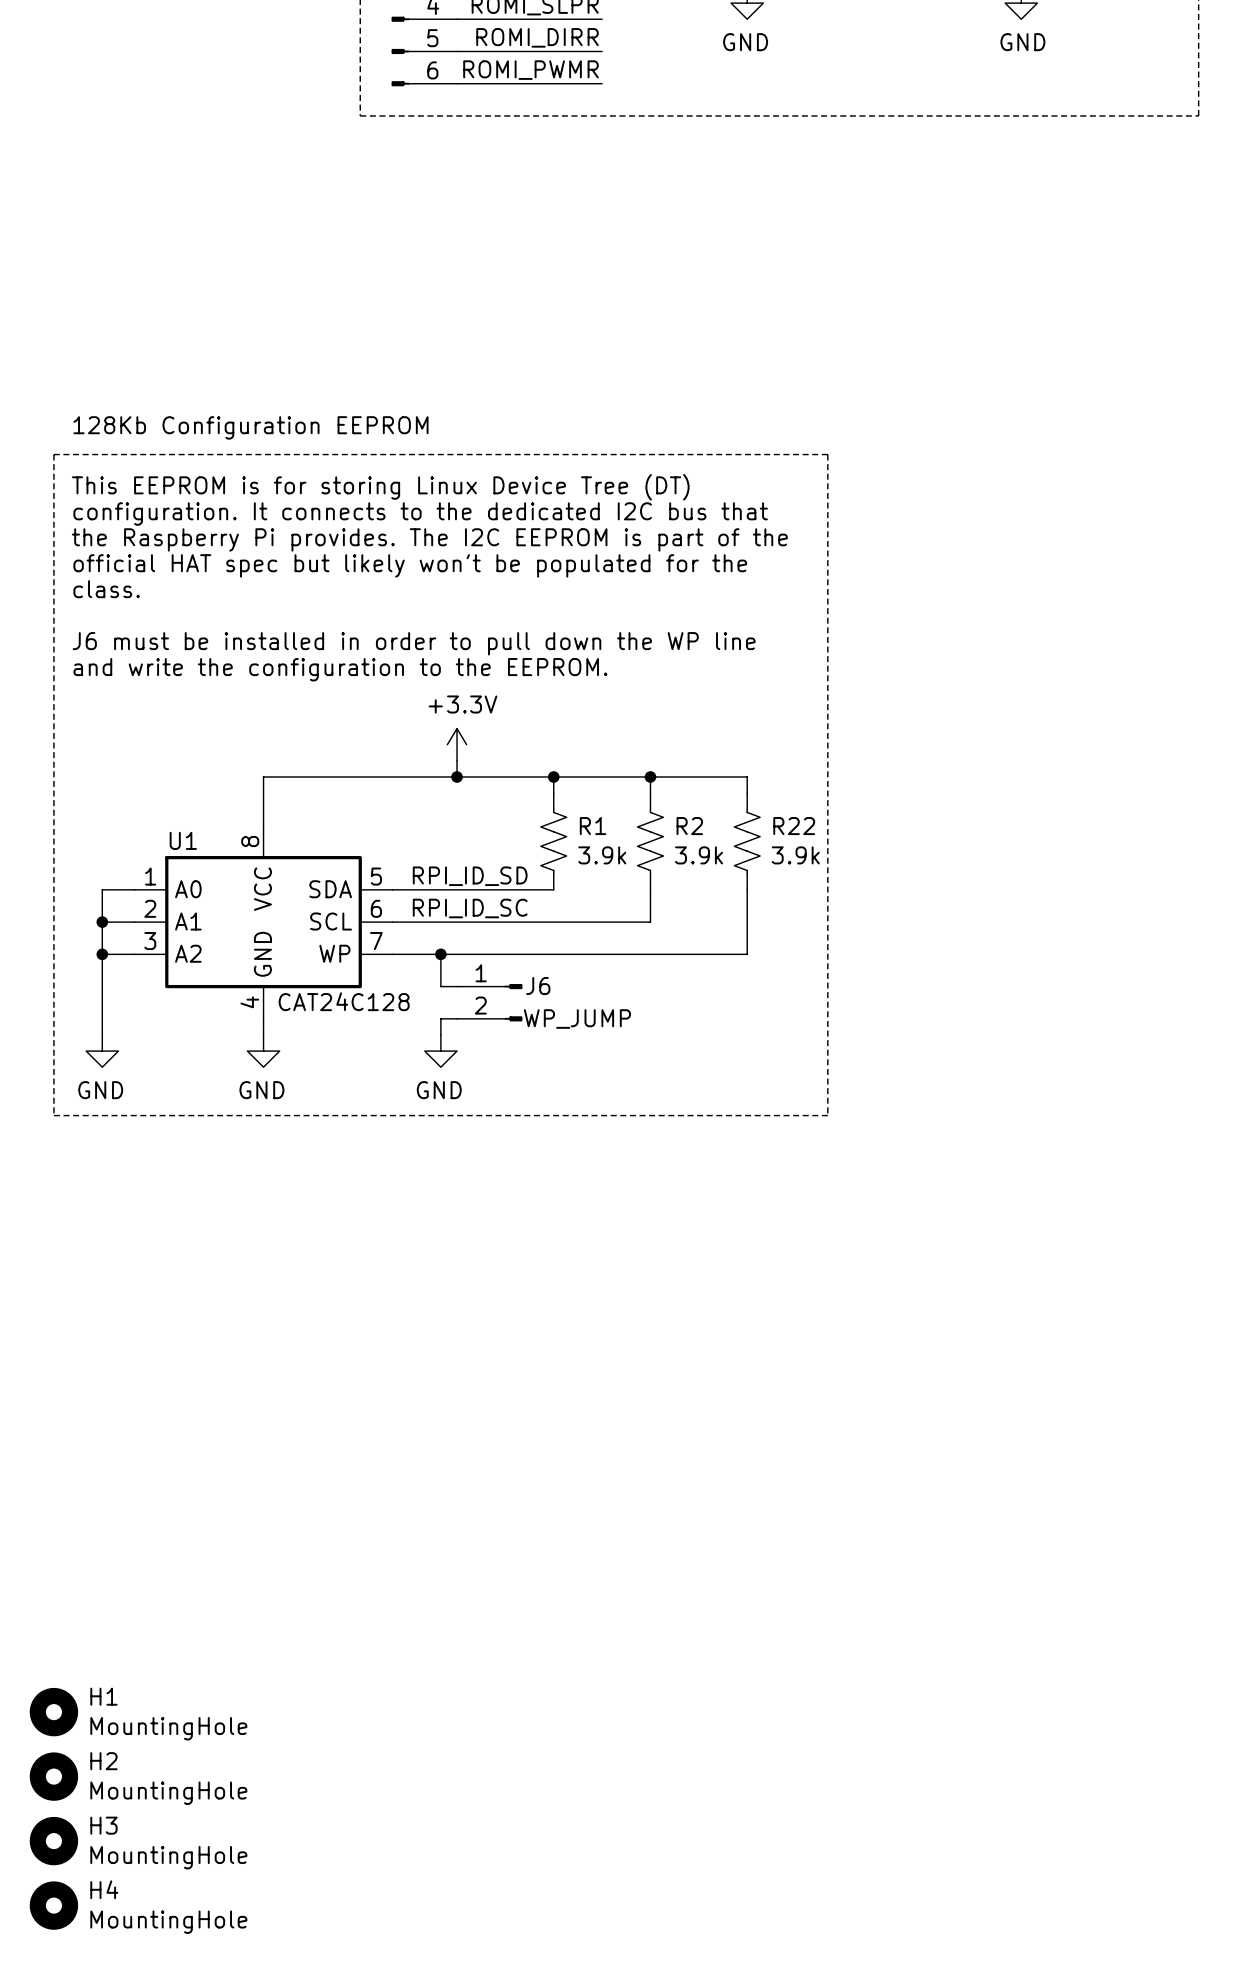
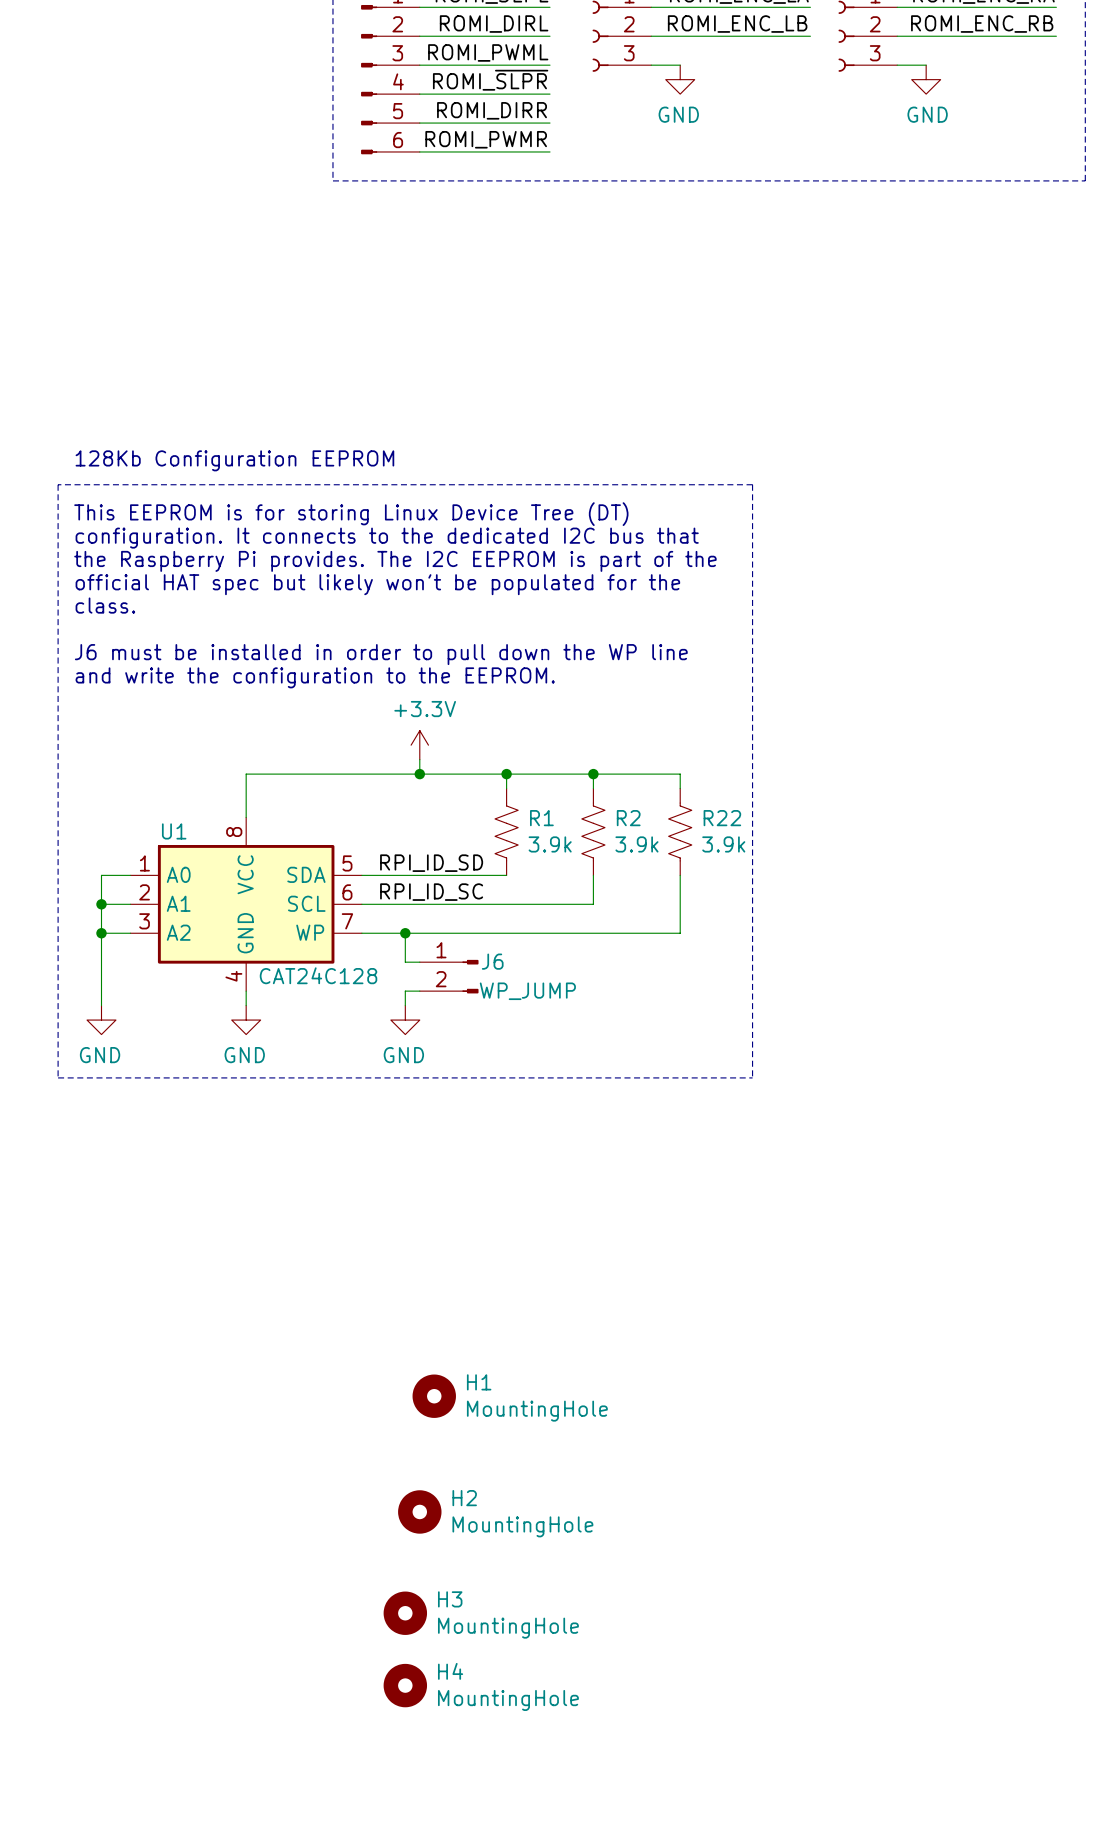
H1 position: (53, 1712) -> (434, 1396)
H2 position: (53, 1776) -> (419, 1511)
H3 position: (53, 1841) -> (405, 1613)
H4 position: (53, 1905) -> (405, 1685)

